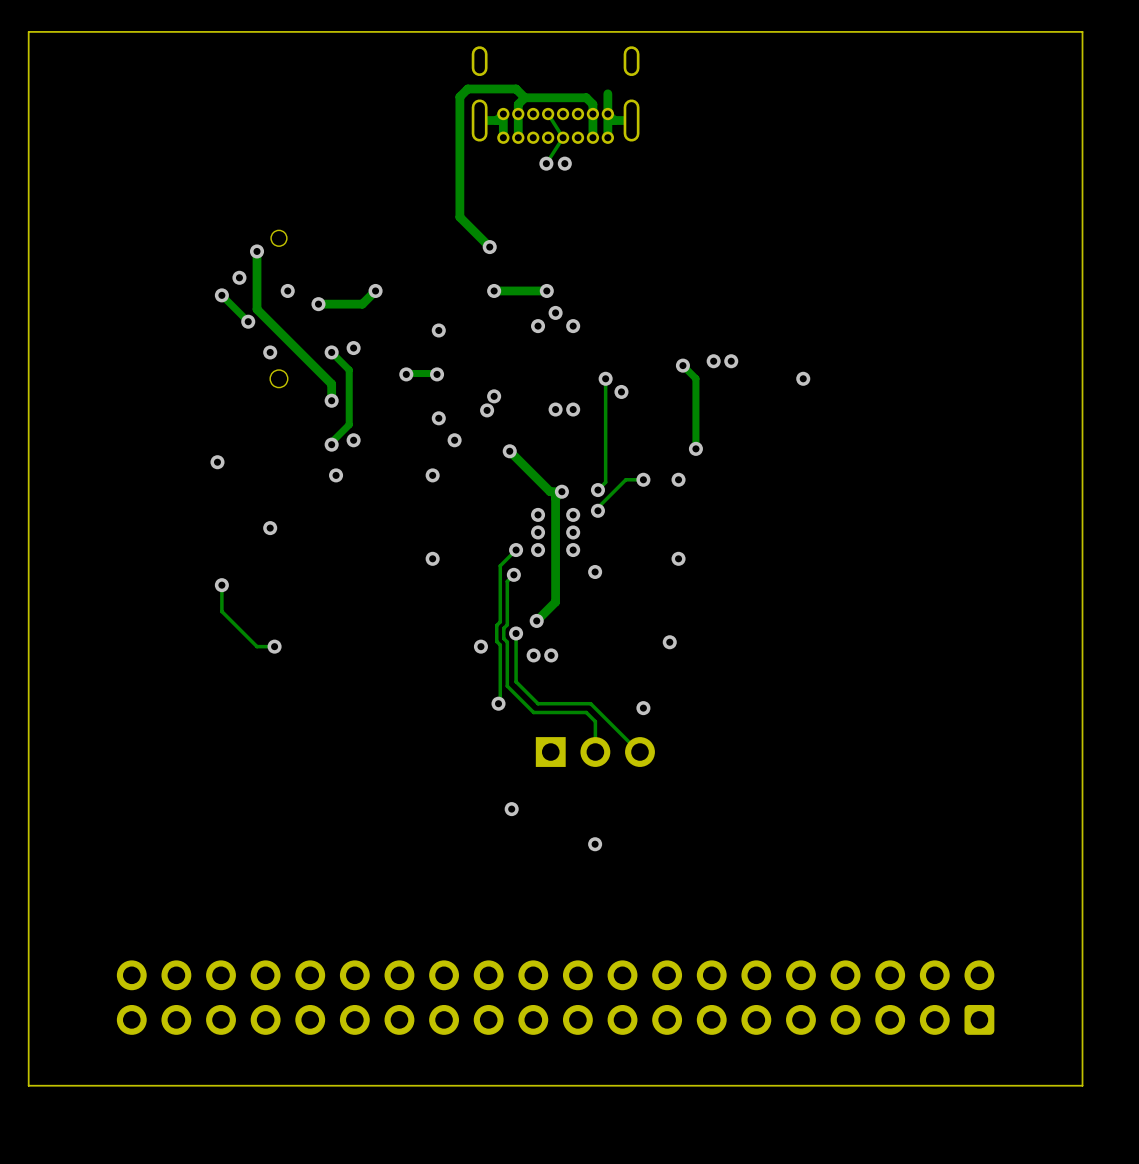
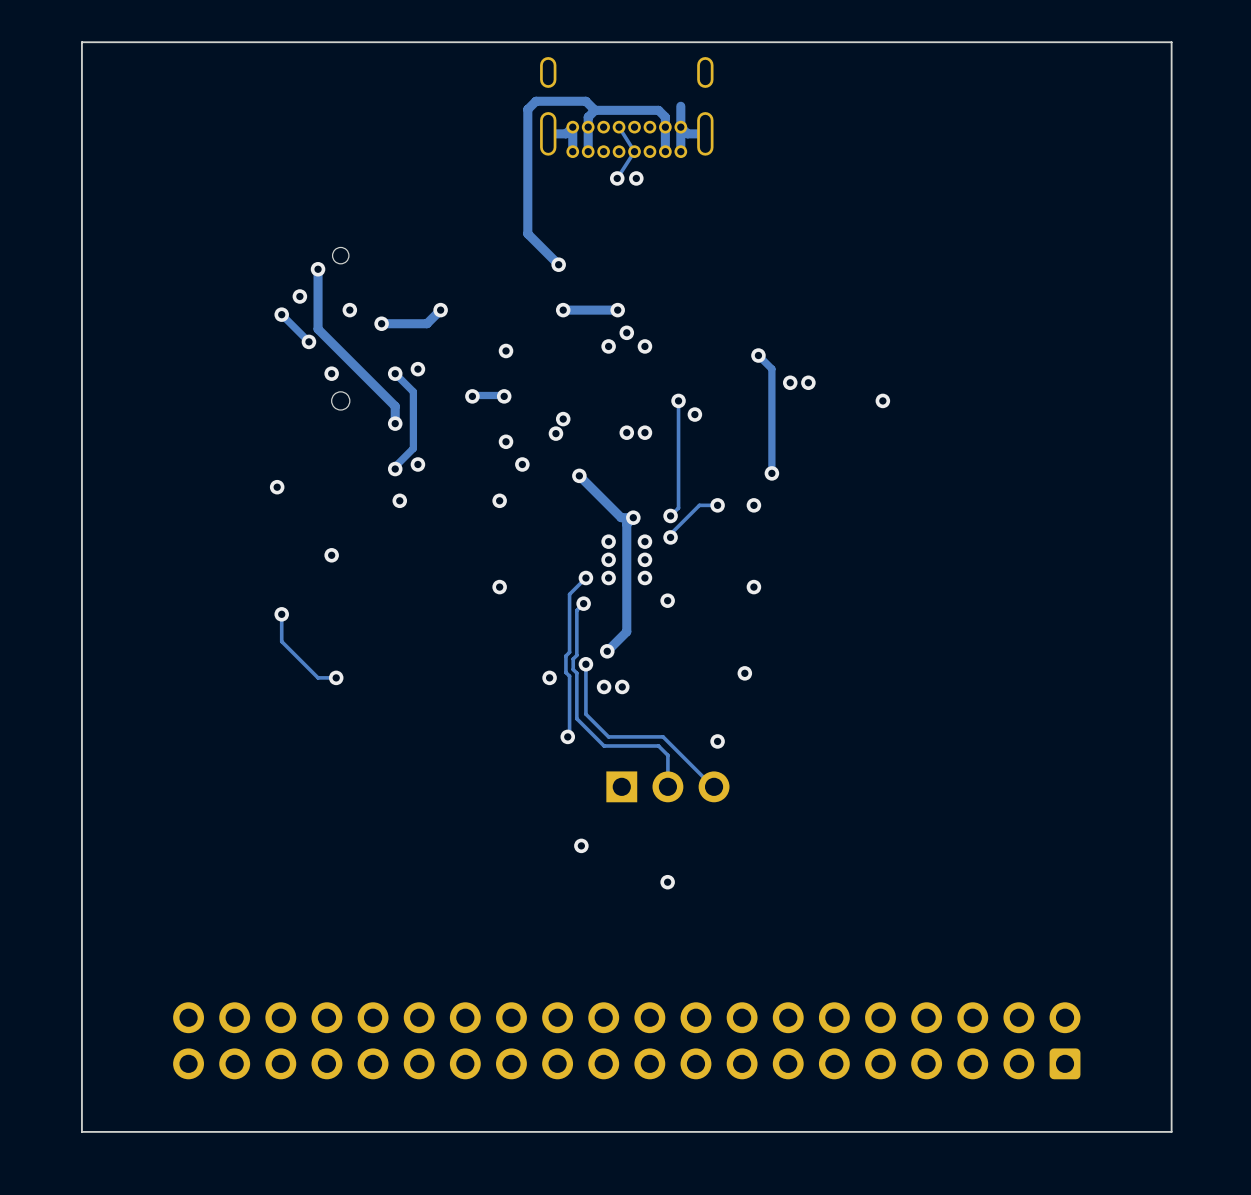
track: (682, 365) (695, 378) -> (758, 355) (771, 368) (771, 400)
via position: (682, 365) -> (758, 355)

